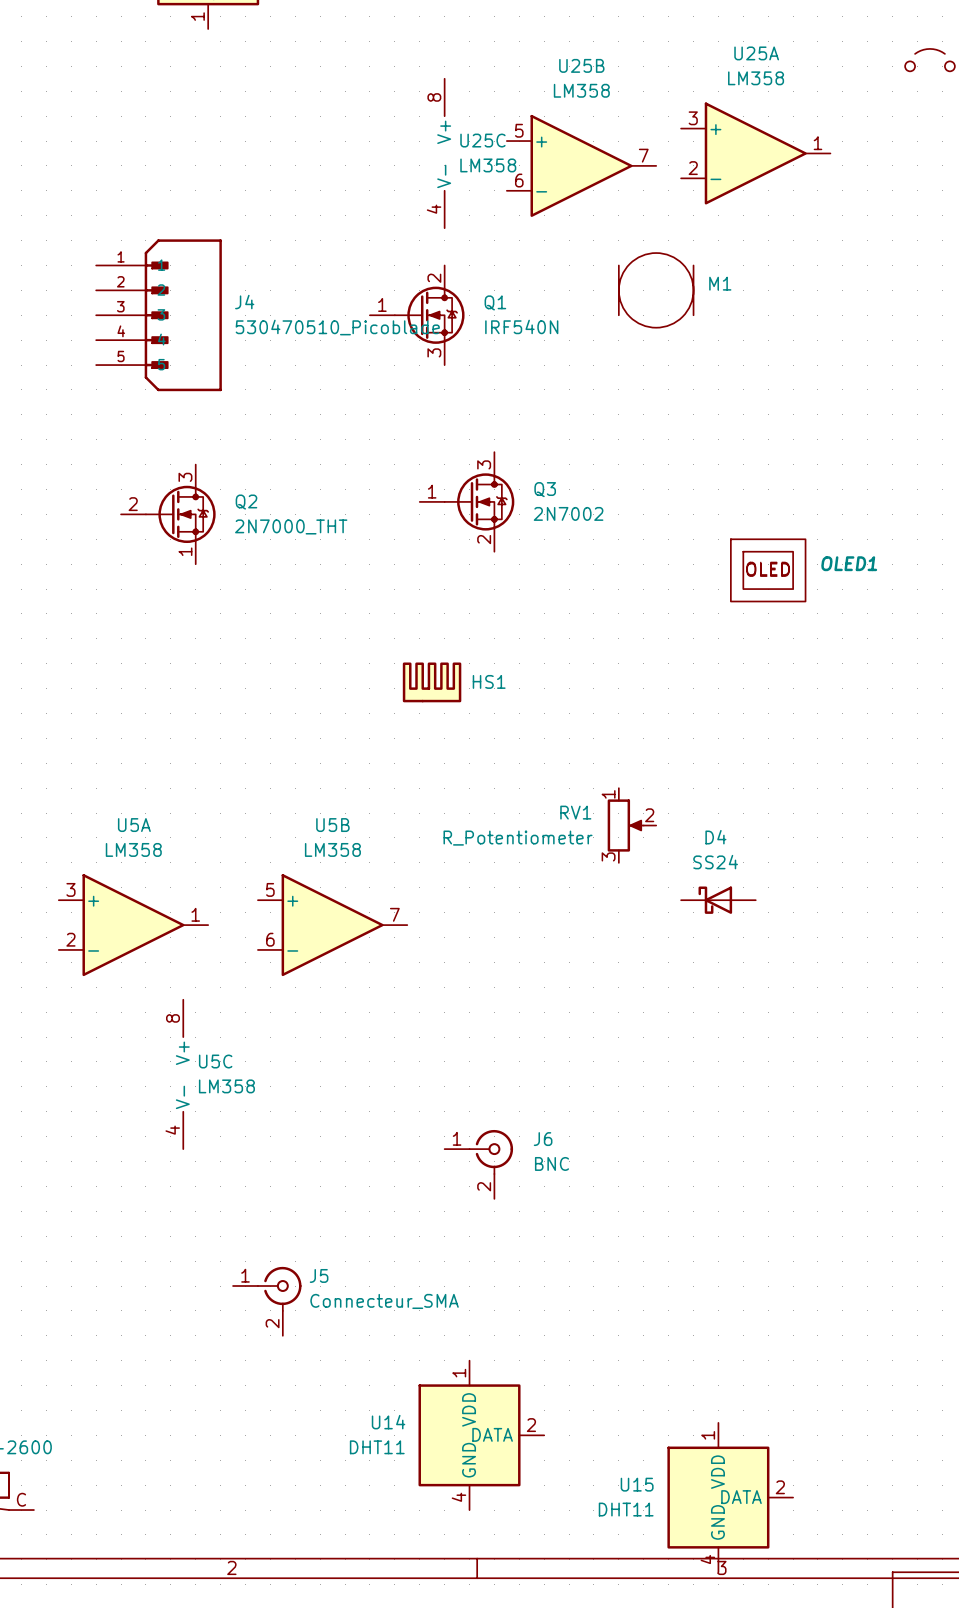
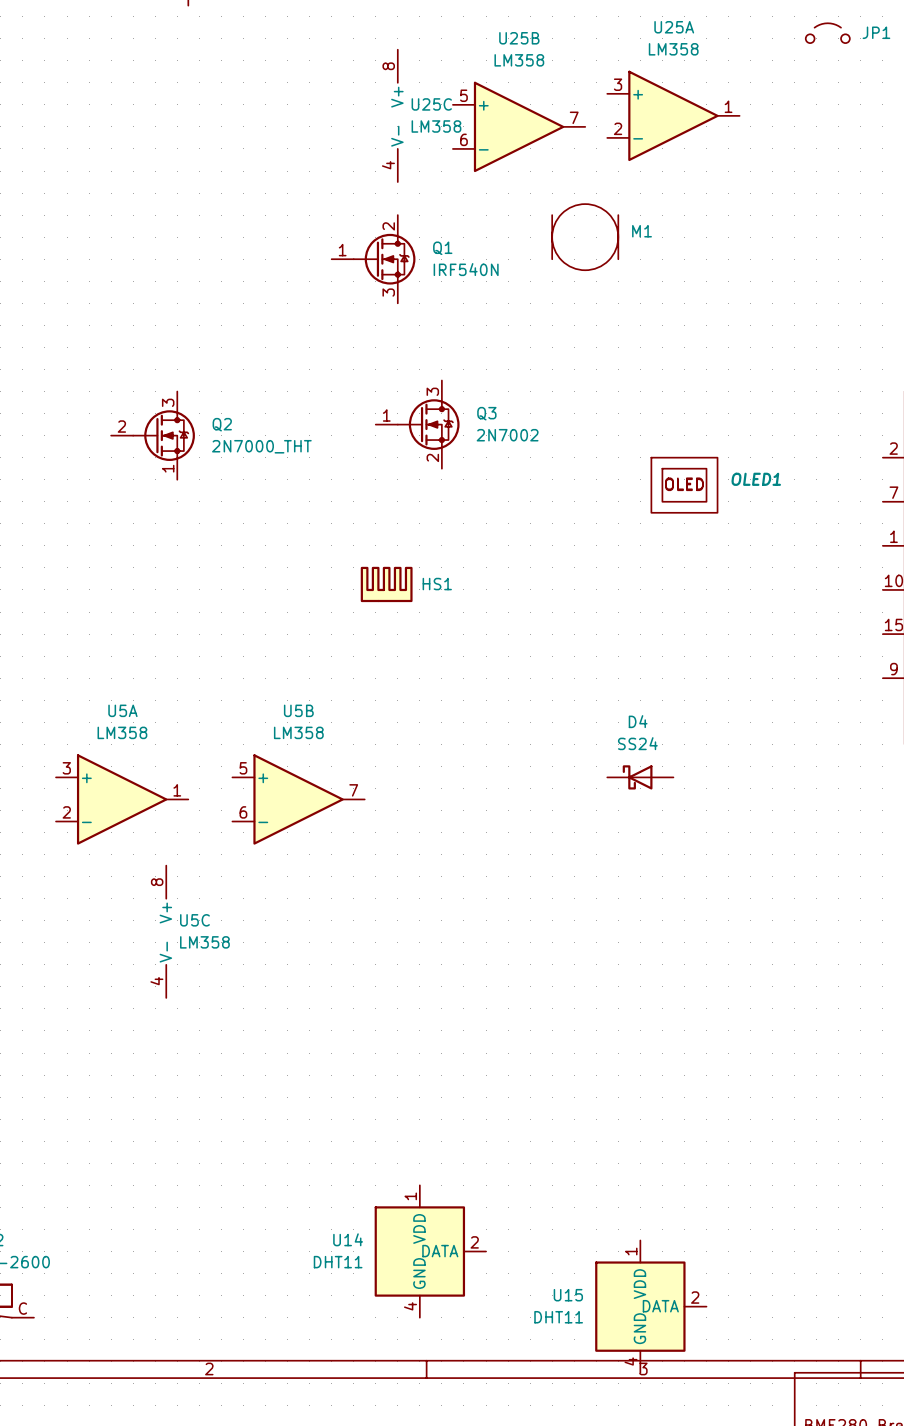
J4: 530470510_Picoblade (159, 315) -> none
RV1: R_Potentiometer (631, 825) -> none
J6: BNC (478, 1164) -> none
J5: Connecteur_SMA (267, 1301) -> none

